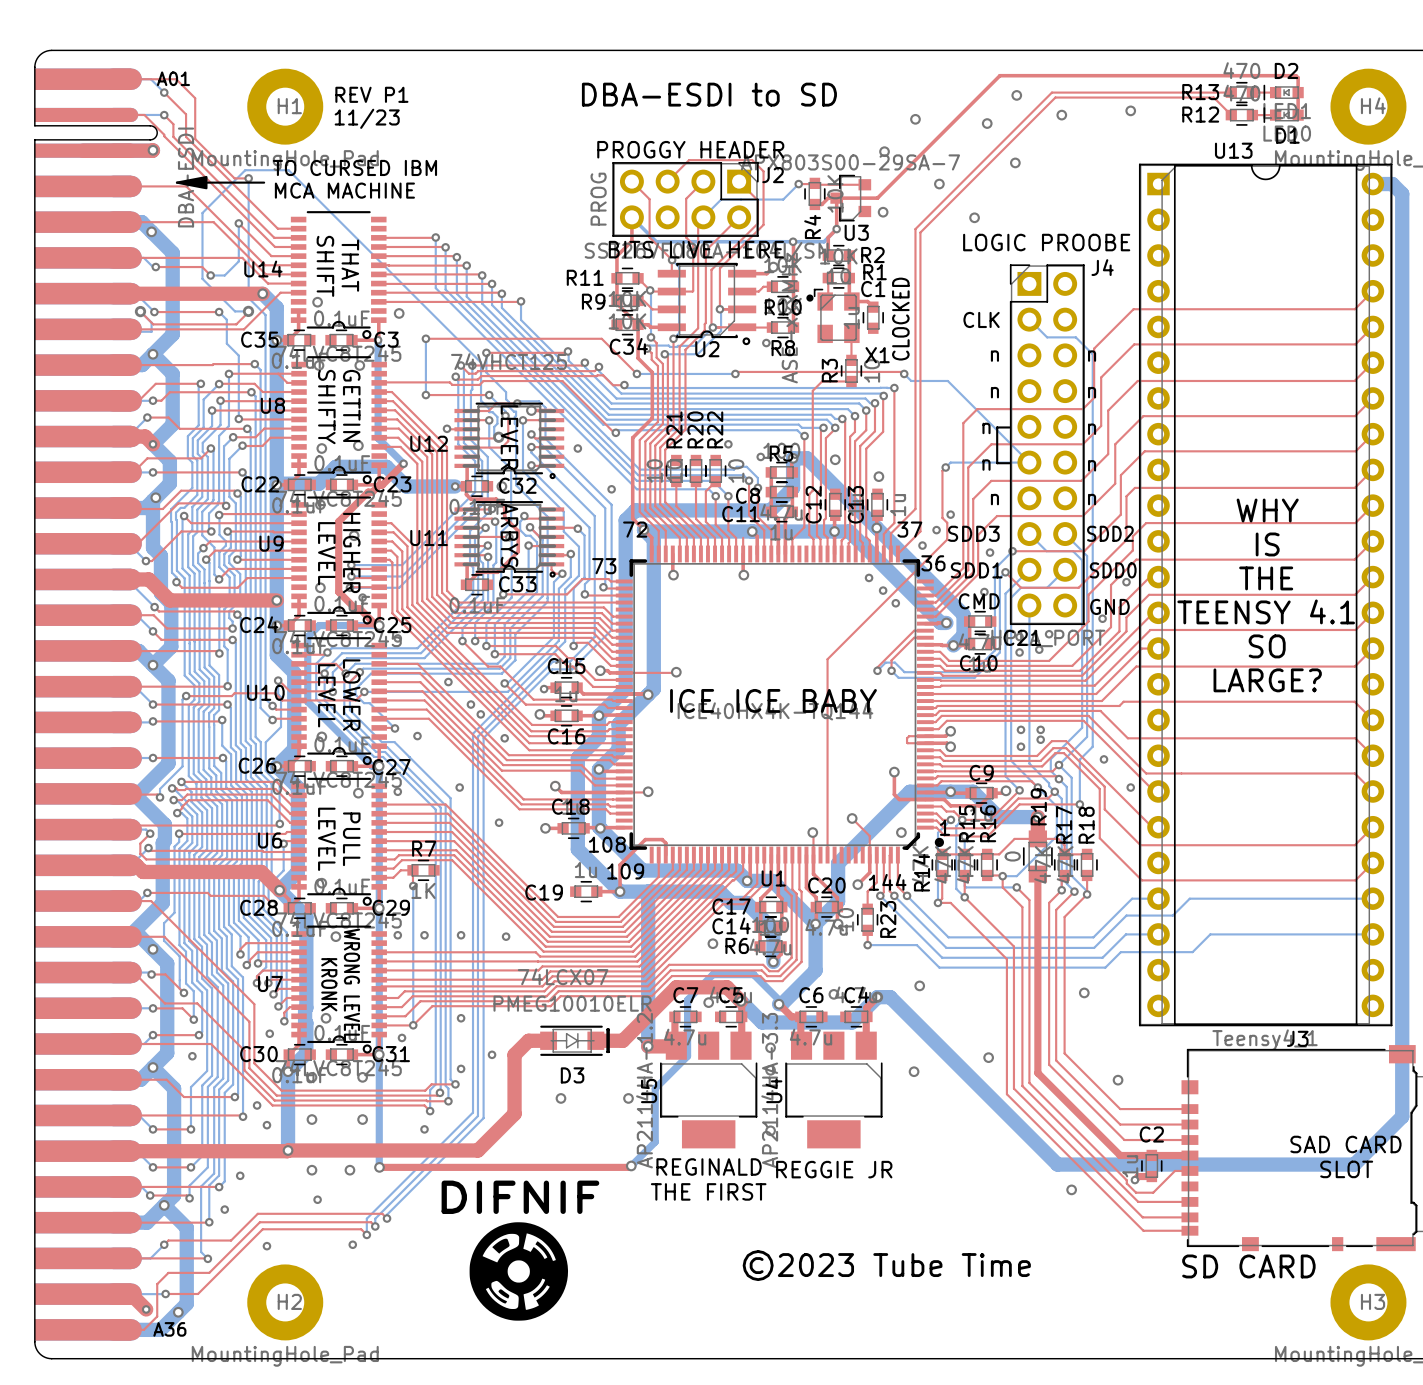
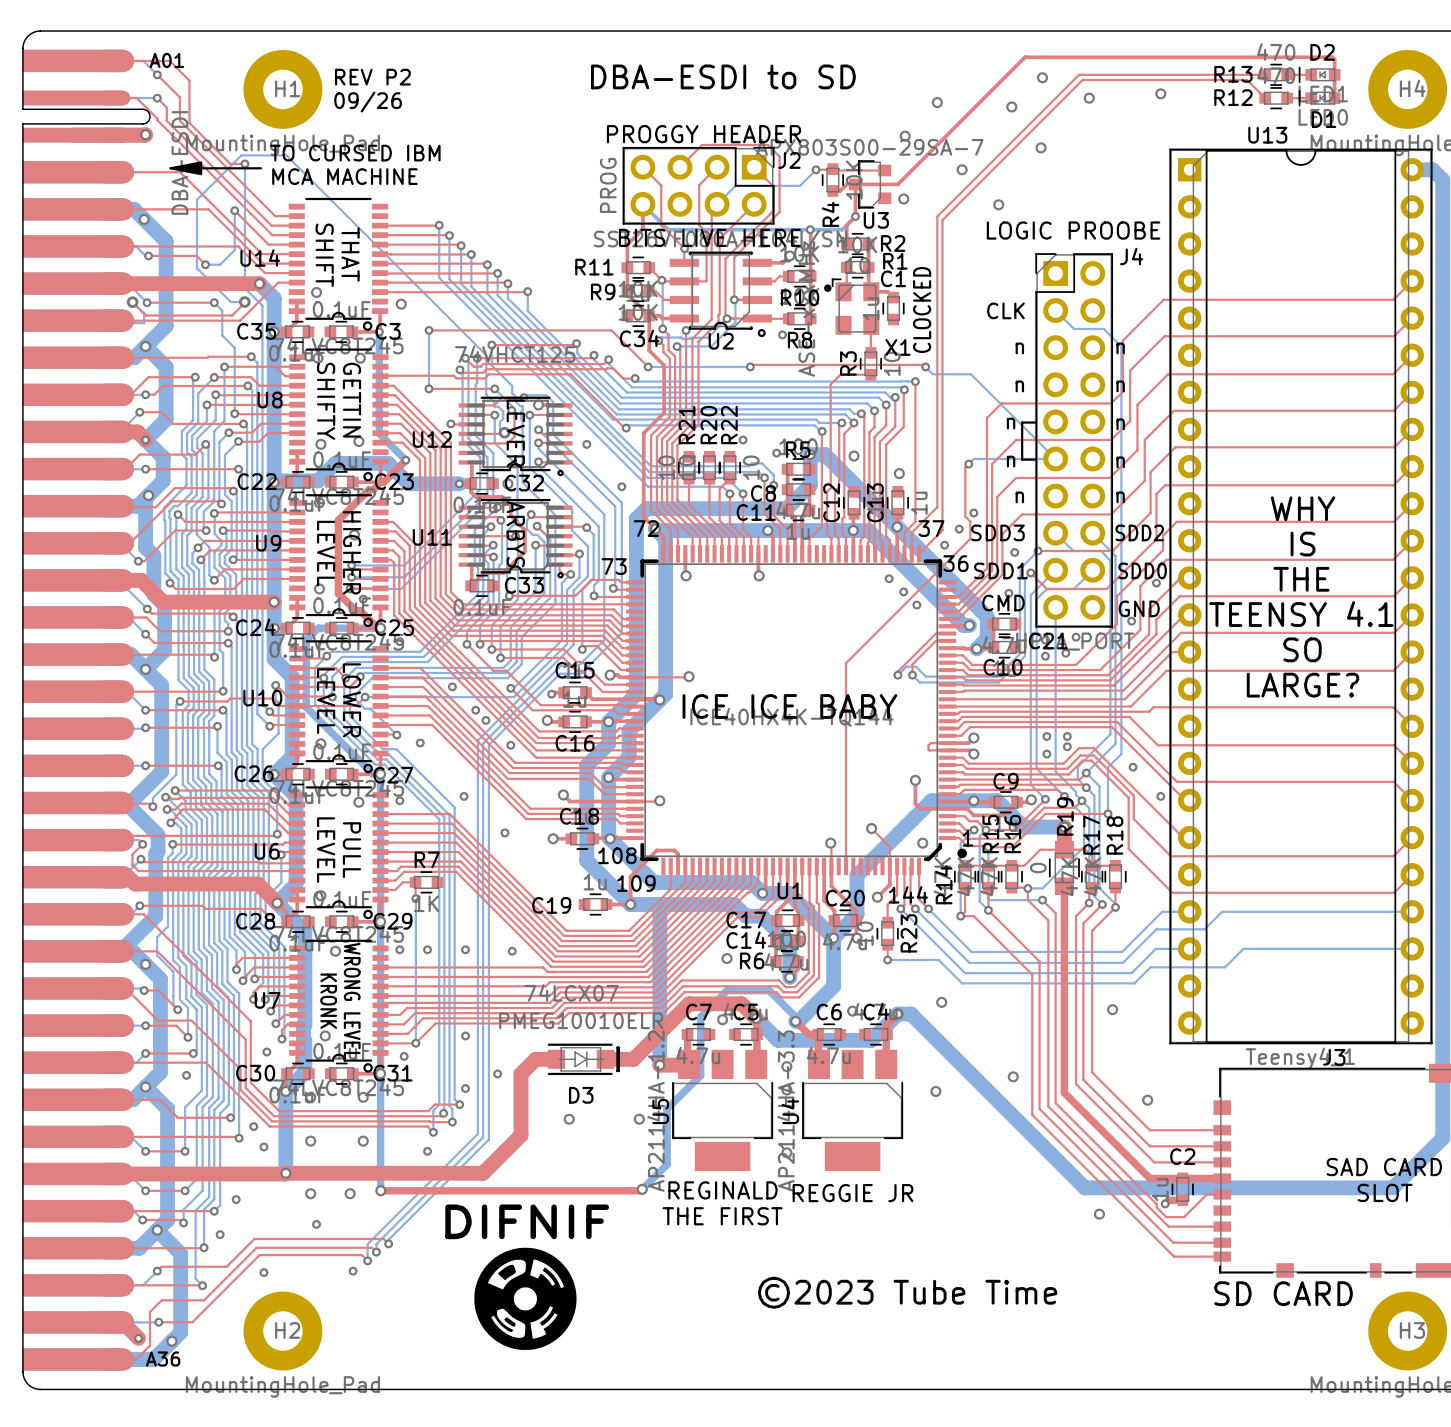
text: REV P1 (371, 94) -> REV P2 (372, 77)
text: 11/23 (367, 118) -> 09/26 (368, 102)

